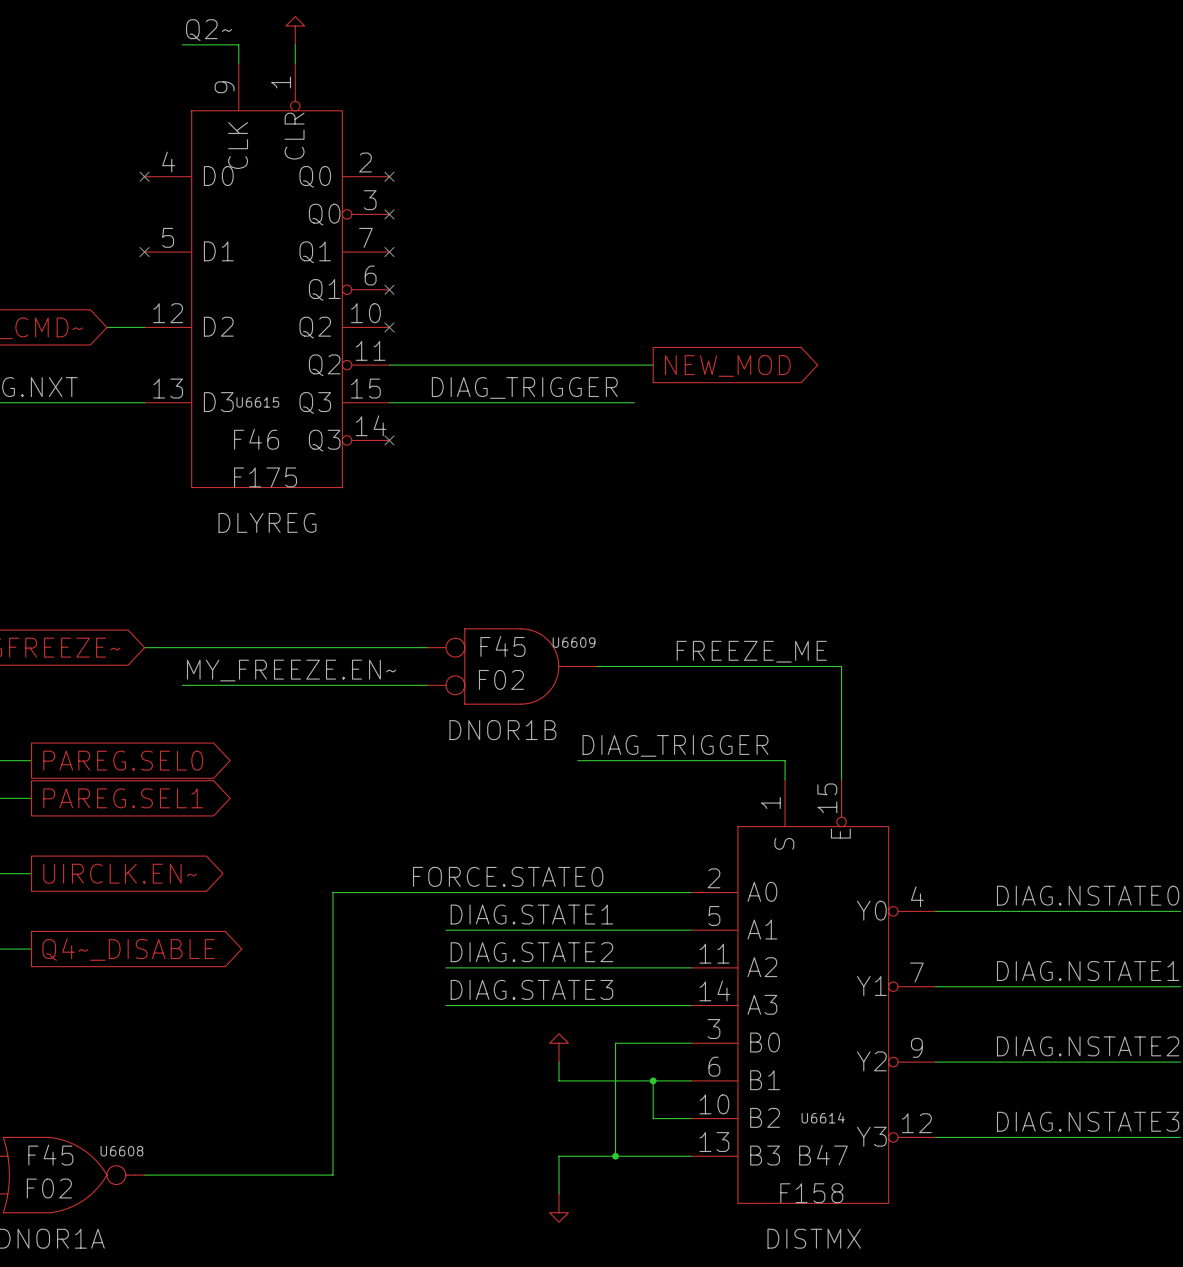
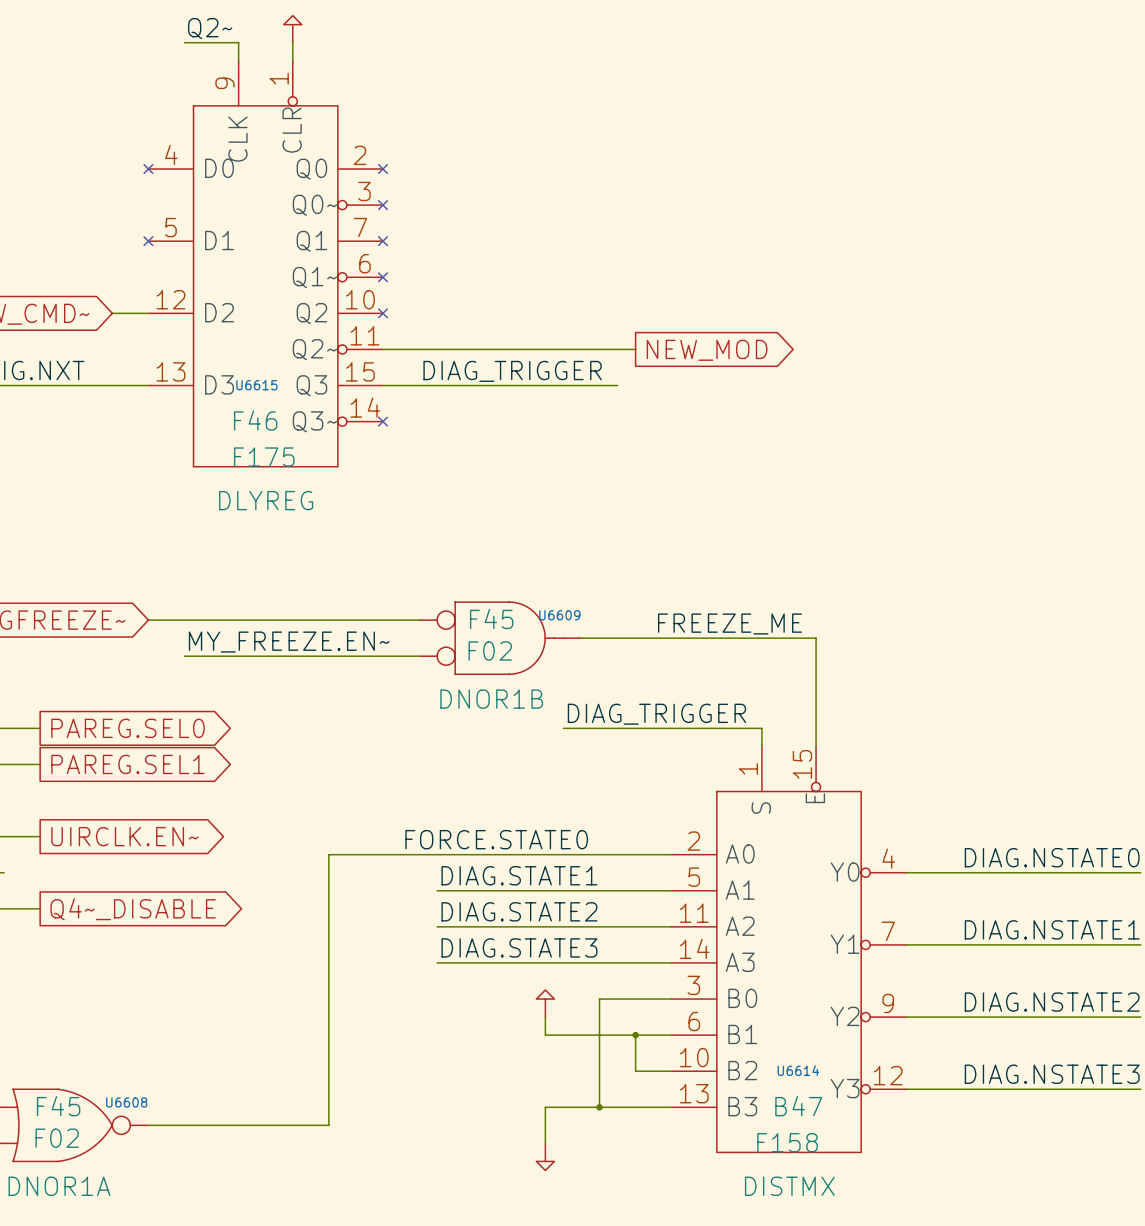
U6615 pin name: Q0 (324, 214) -> Q0~ (314, 205)
U6615 pin name: Q1 (324, 289) -> Q1~ (314, 277)
U6615 pin name: Q2 (324, 365) -> Q2~ (314, 349)
U6615 pin name: Q3 (324, 440) -> Q3~ (314, 421)

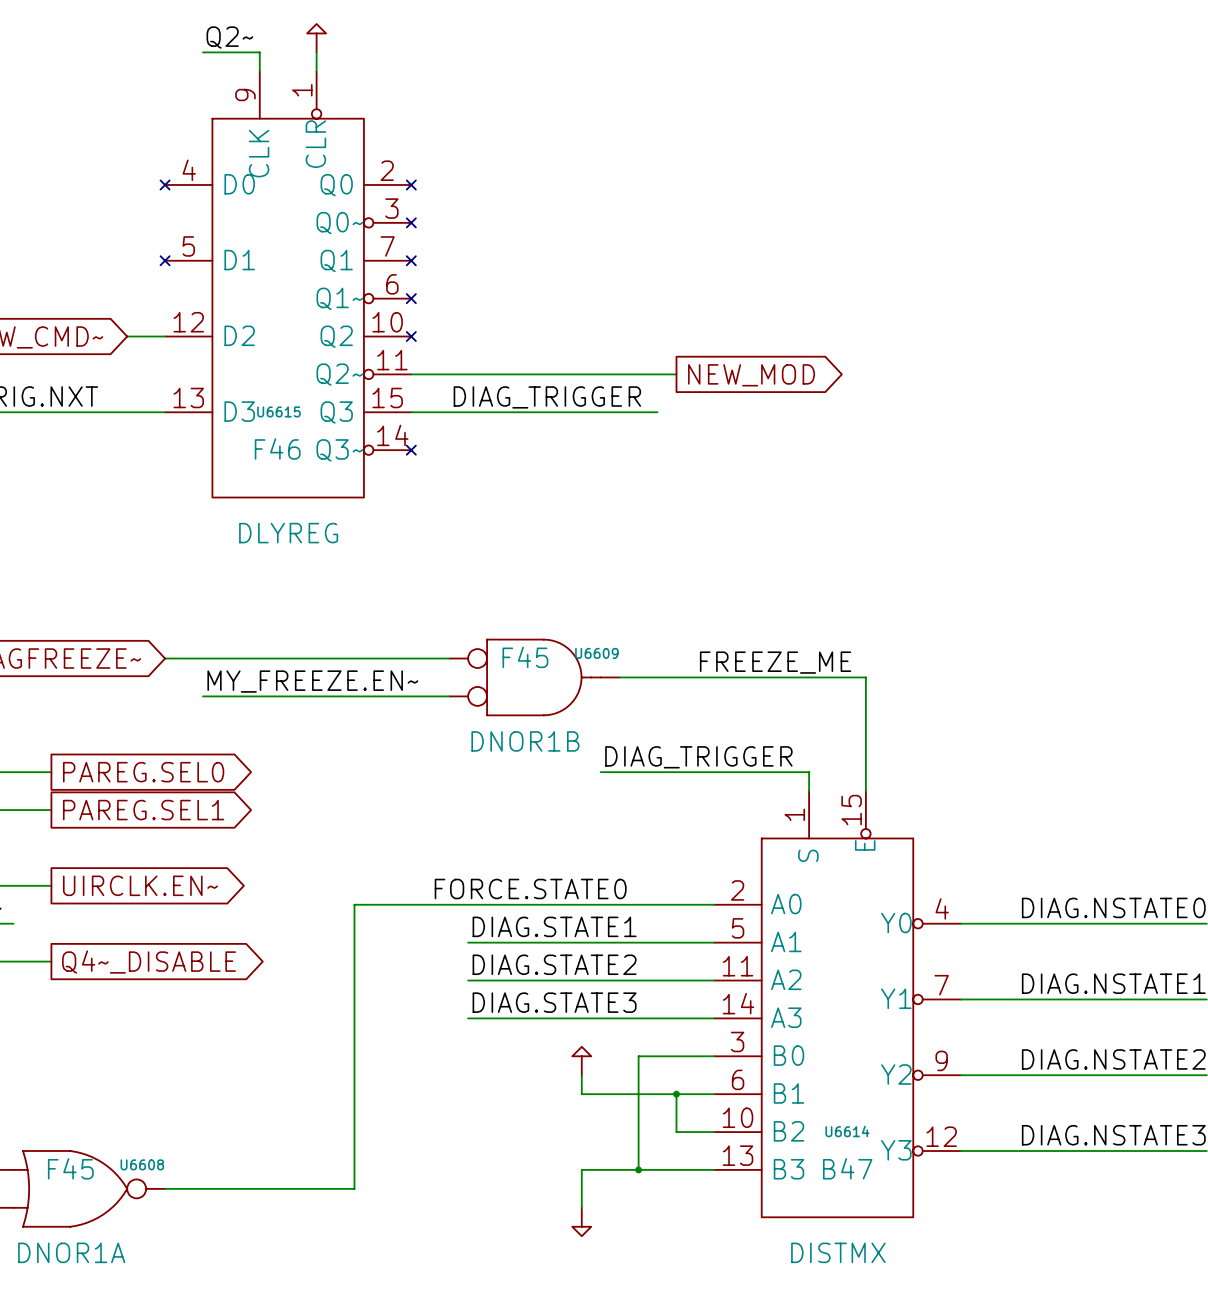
U6615 value: F175 (264, 457) -> none
U6609 value: F02 (490, 651) -> none
U6608 value: F02 (57, 1138) -> none
U6614 value: F158 (787, 1142) -> none

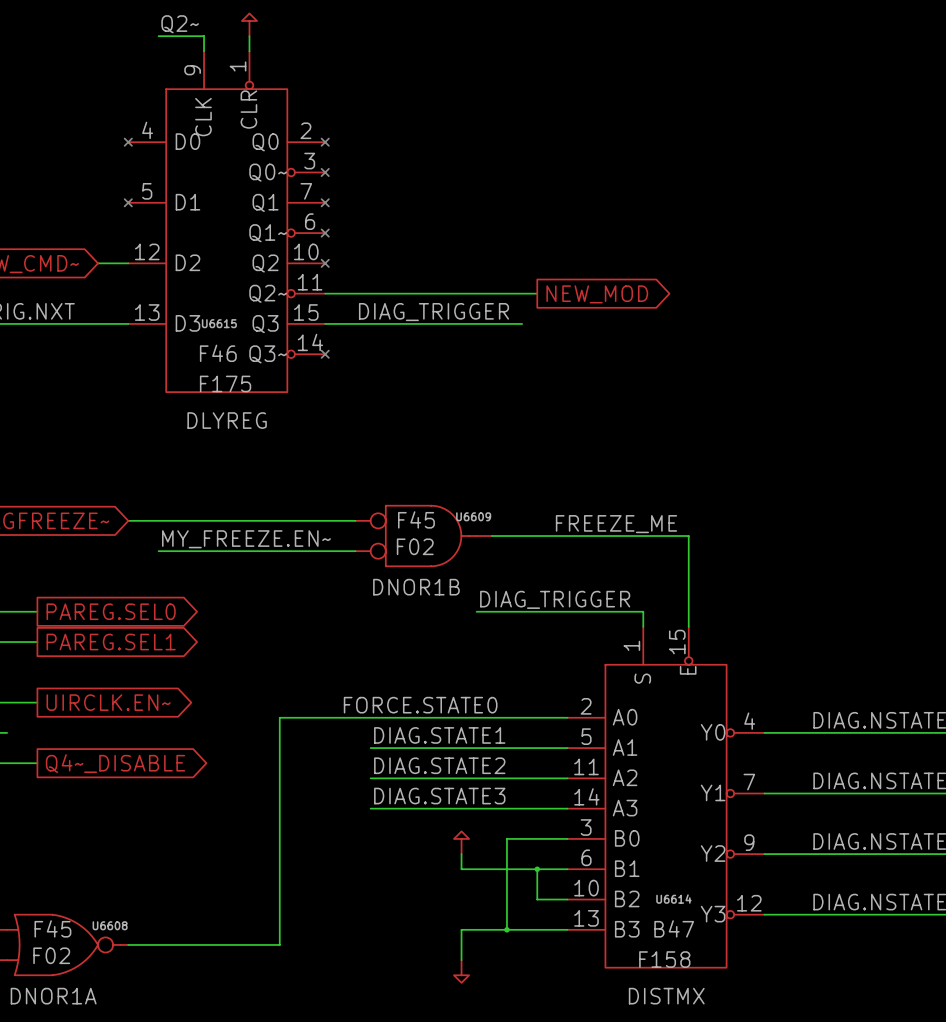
U6615 value: none -> F175 (225, 383)
U6609 value: none -> F02 (415, 546)
U6608 value: none -> F02 (51, 955)
U6614 value: none -> F158 (664, 959)

